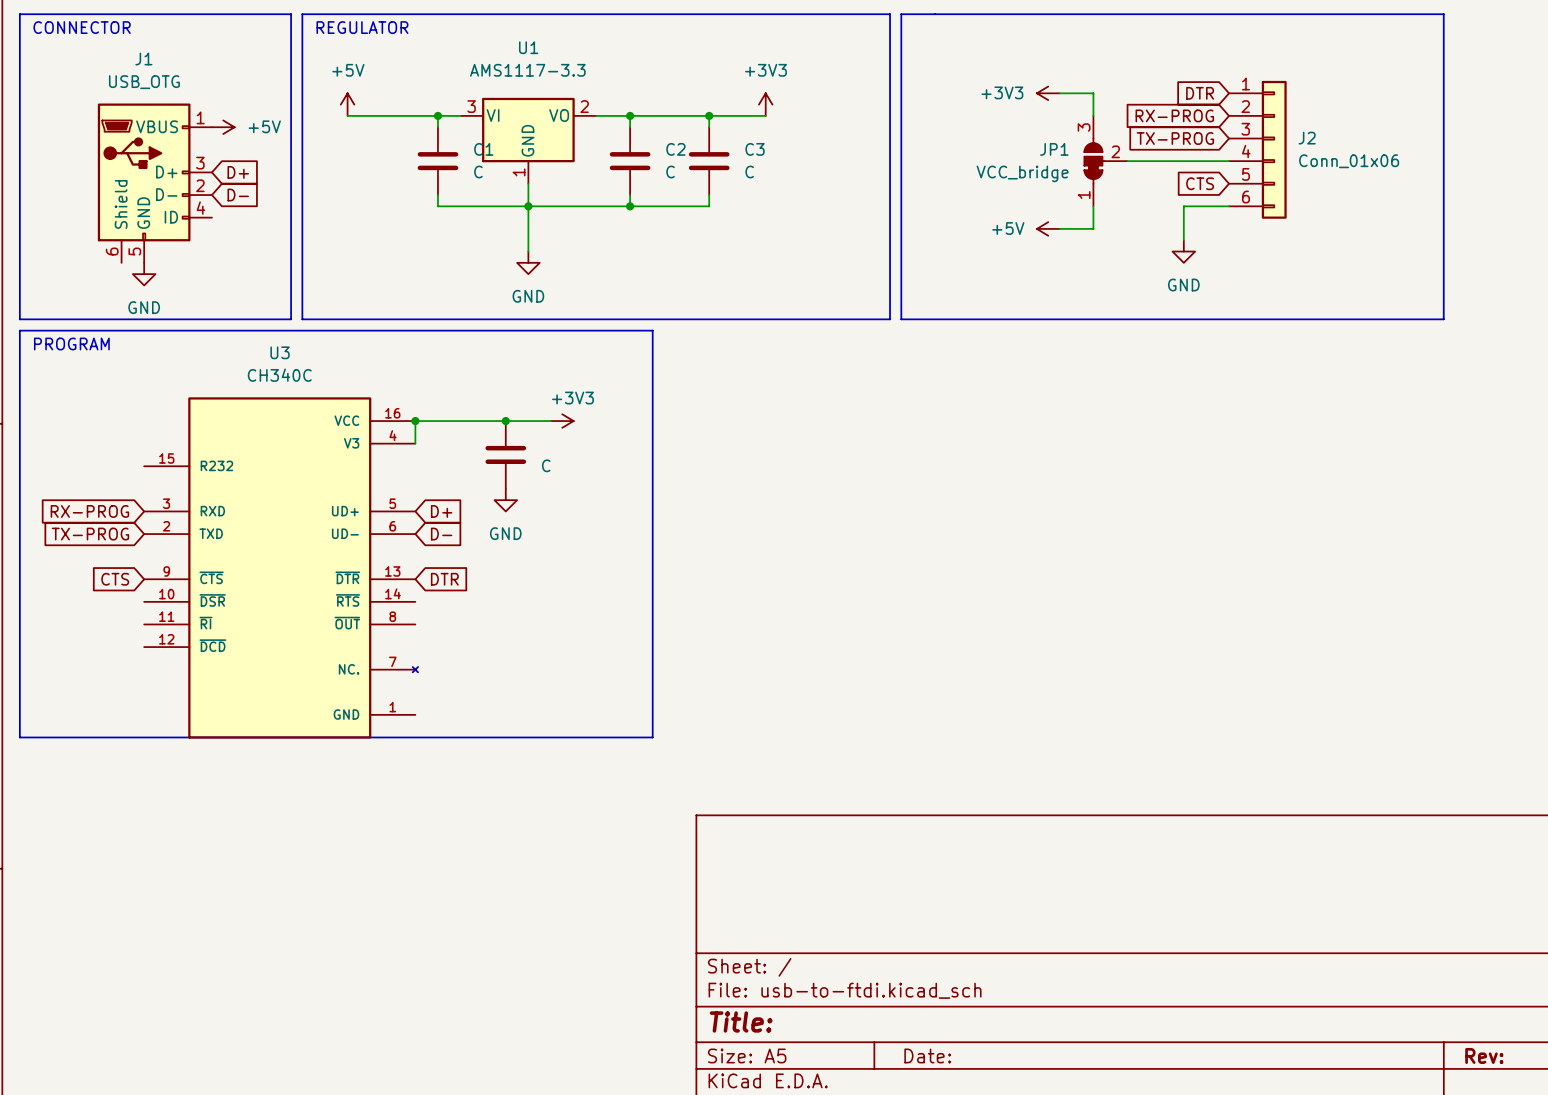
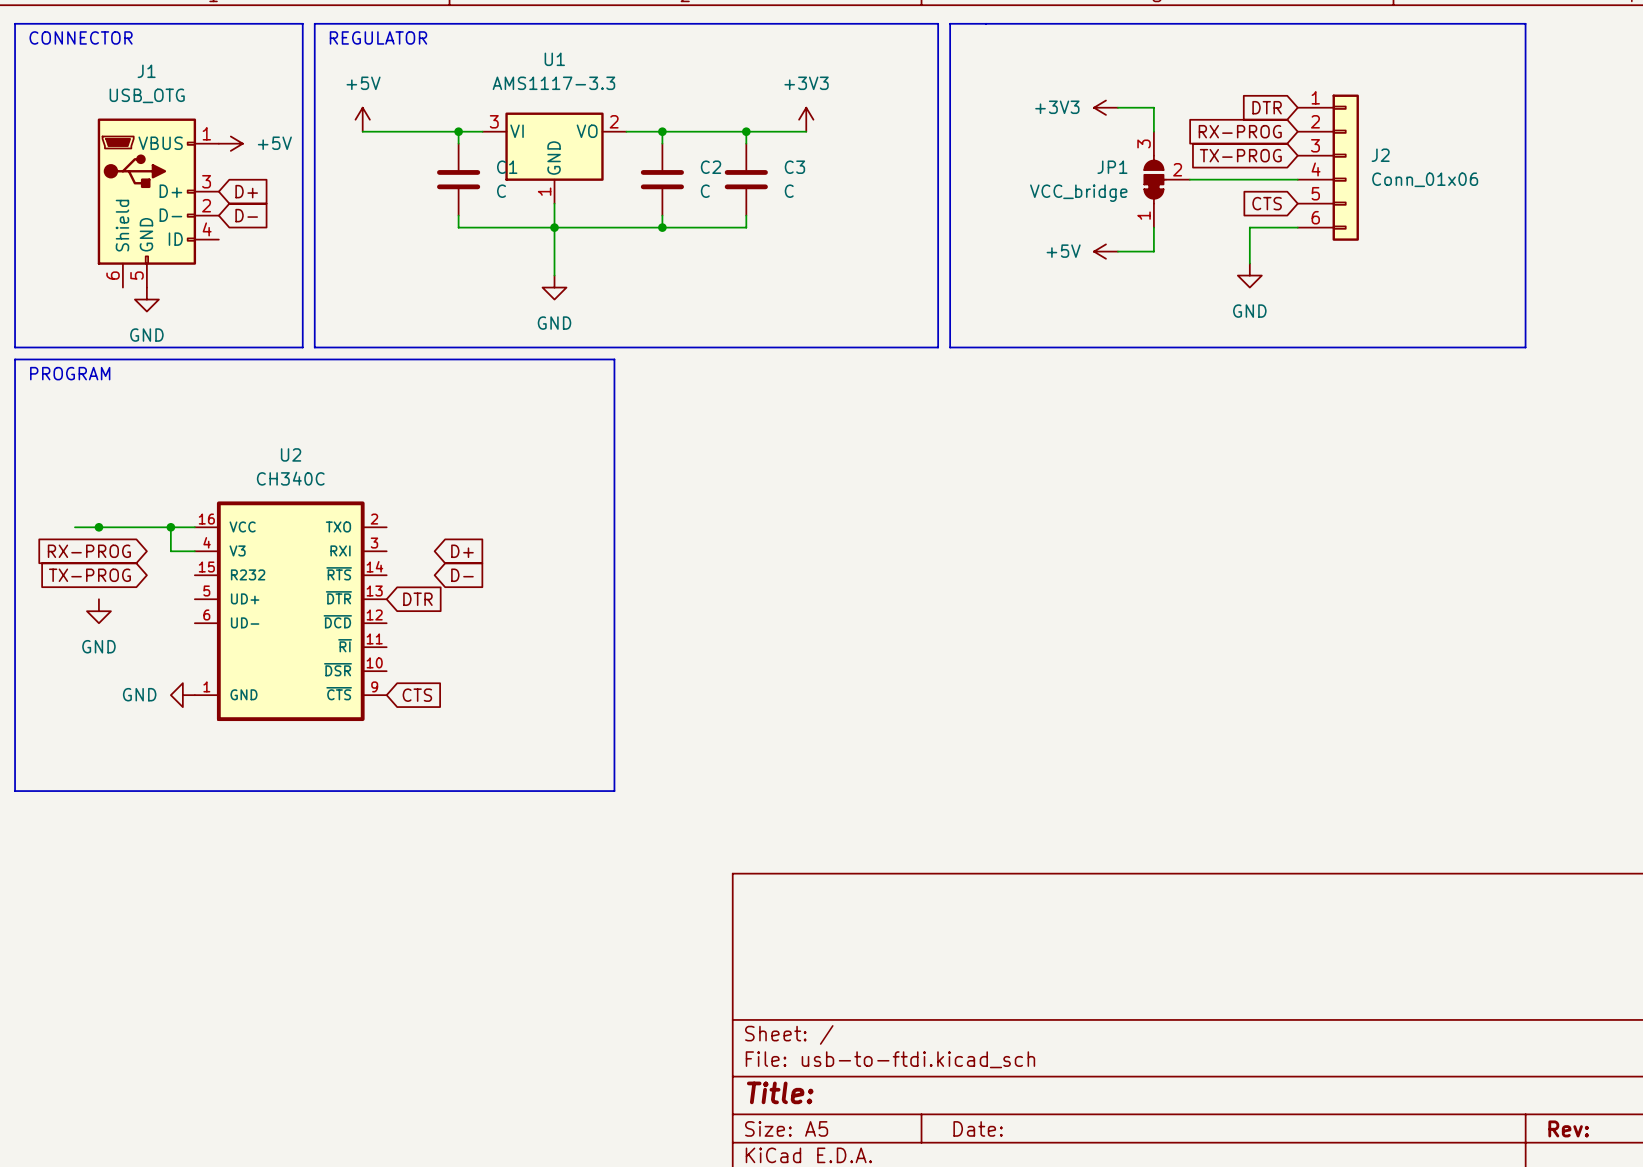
line: (584, 330) (652, 330) (652, 737) (584, 737) -> (614, 359) (614, 791)
junction: (415, 421) -> none
junction: (505, 421) -> none
wire: (550, 421) (415, 421) (415, 443) -> none
power symbol: +3V3 (562, 421) -> none
part: C (505, 454) -> none
wire: none -> (74, 527) (194, 527)
junction: none -> (98, 527)
junction: none -> (170, 527)
power symbol: GND (505, 500) -> none
power symbol: none -> GND (98, 611)
U2: none -> CH340C (290, 611)
U3: CH340C (281, 567) -> none
global label: CTS (115, 579) -> none
global label position: DTR (444, 579) -> DTR (417, 599)
power symbol: none -> GND (182, 695)
global label: none -> CTS (417, 695)

